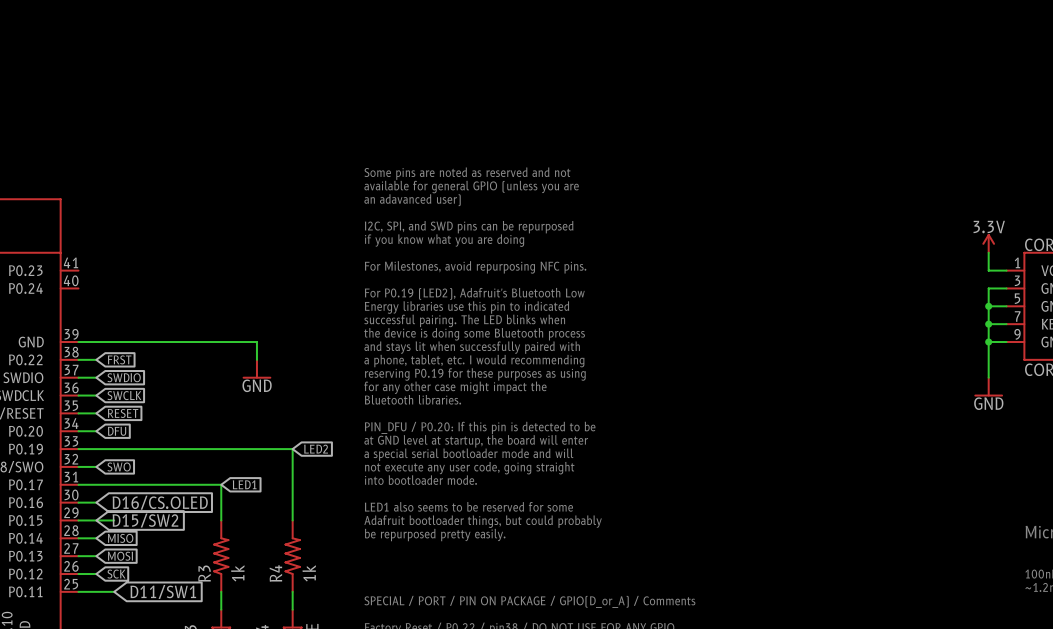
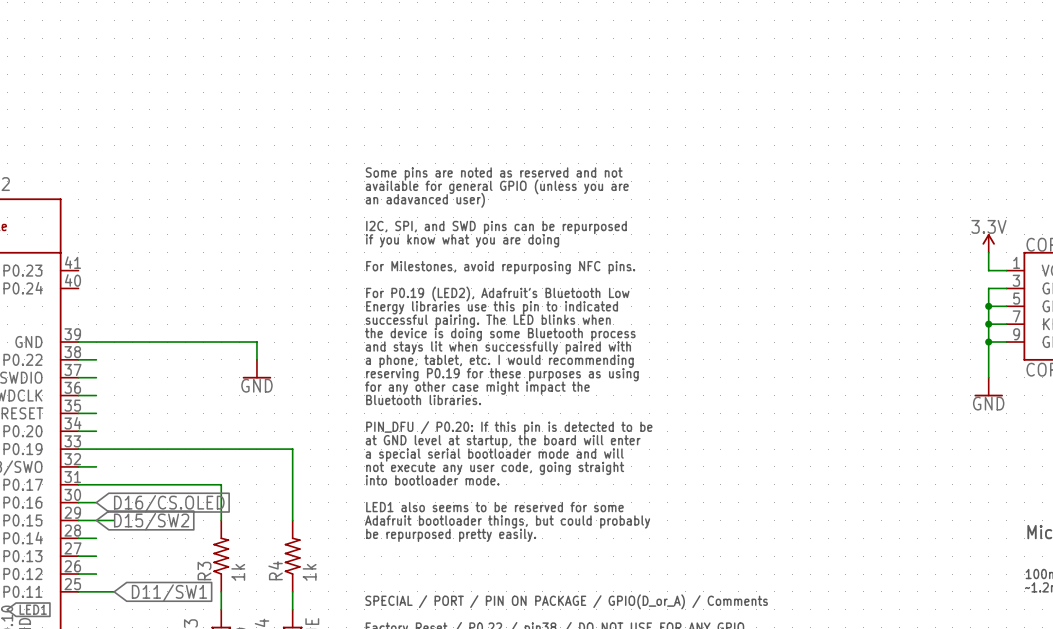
global label: FRST (119, 359) -> none
global label: SWDIO (124, 377) -> none
global label: SWCLK (124, 395) -> none
global label: RESET (123, 413) -> none
global label: DFU (117, 431) -> none
global label: LED2 (316, 449) -> none
global label: SWO (119, 466) -> none
global label: LED1 (244, 484) -> none
global label: MISO (120, 538) -> none
global label: MOSI (120, 556) -> none
global label: SCK (116, 574) -> none
global label: none -> LED1 (33, 609)

